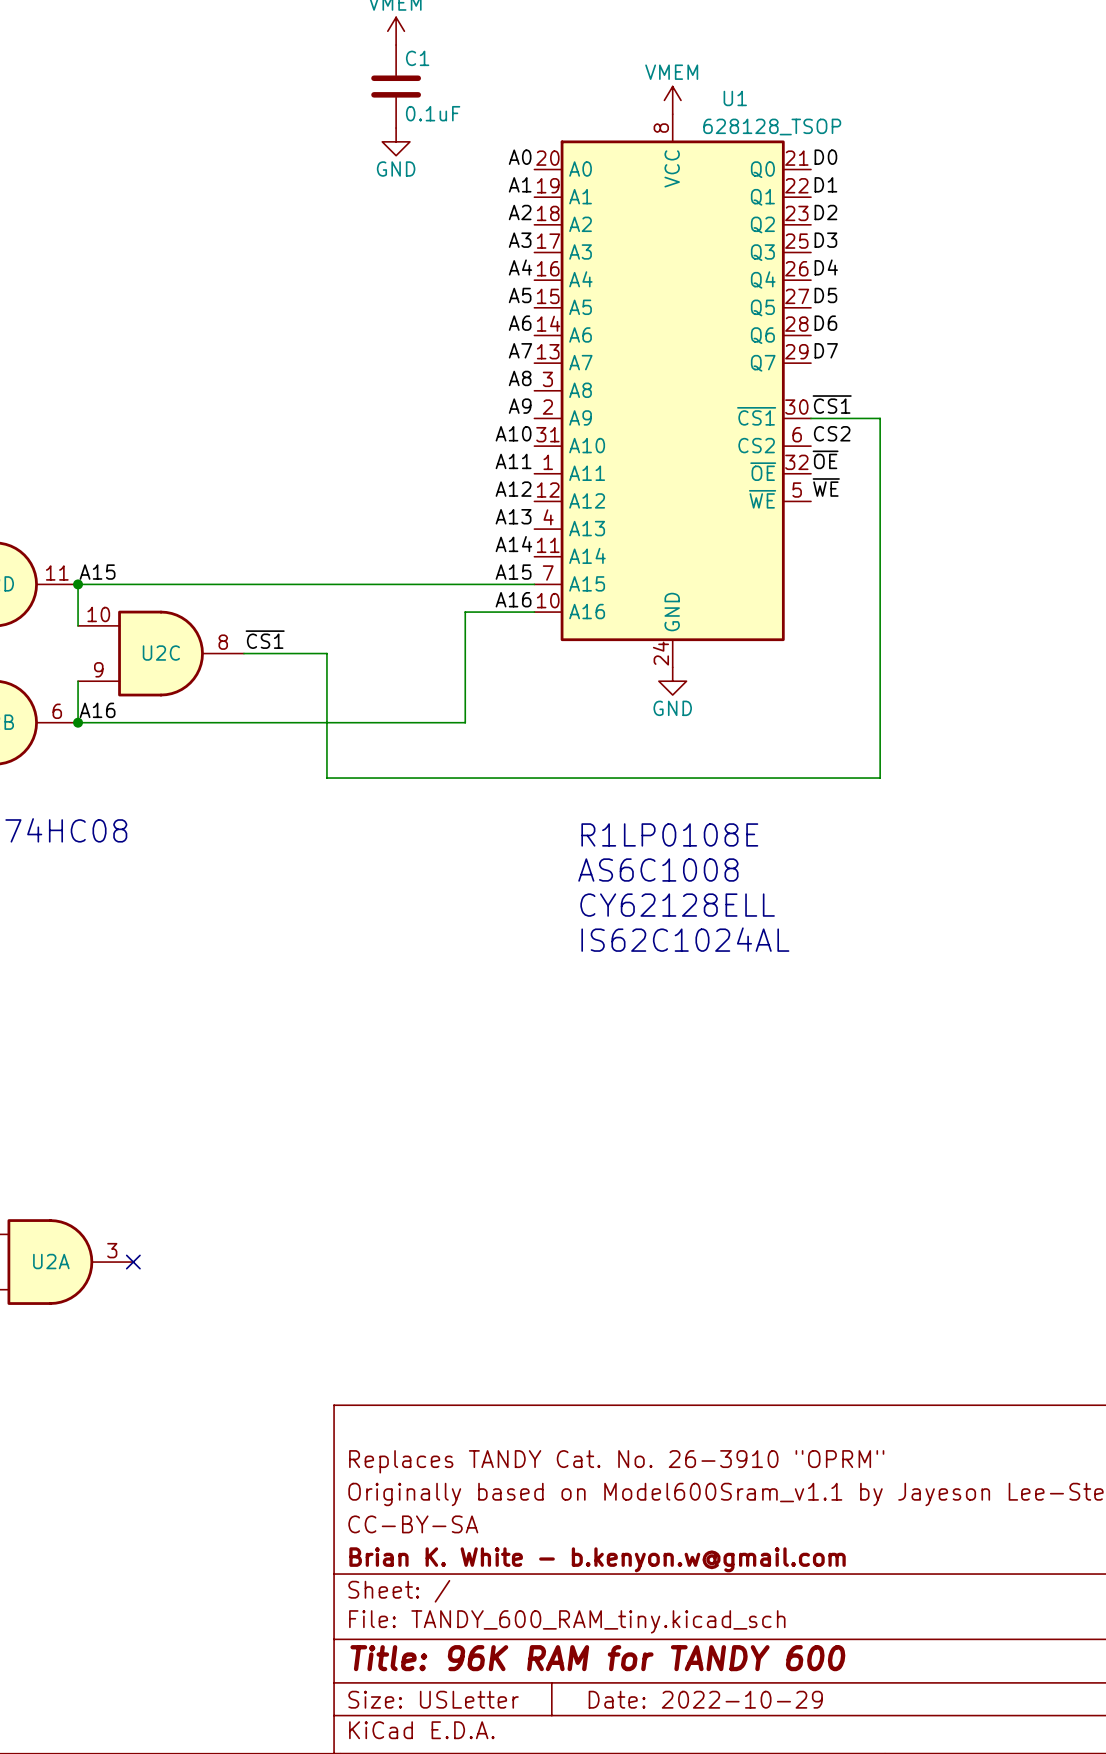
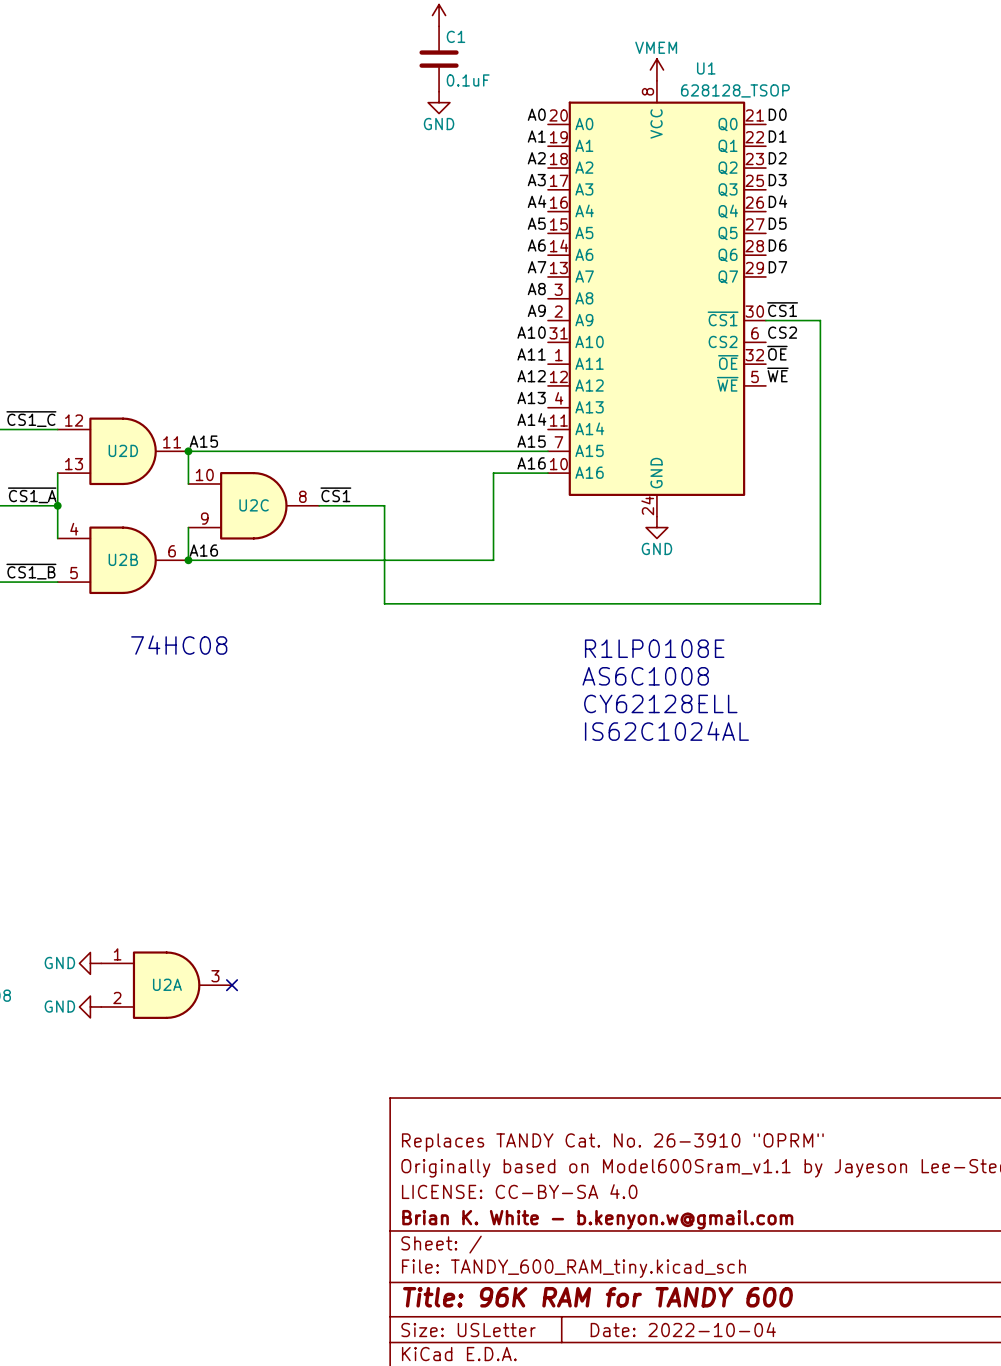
title block: CC-BY-SA (413, 1524) -> LICENSE: CC-BY-SA 4.0 (519, 1191)
title block: Date: 2022-10-29 (705, 1699) -> Date: 2022-10-04 (683, 1329)

